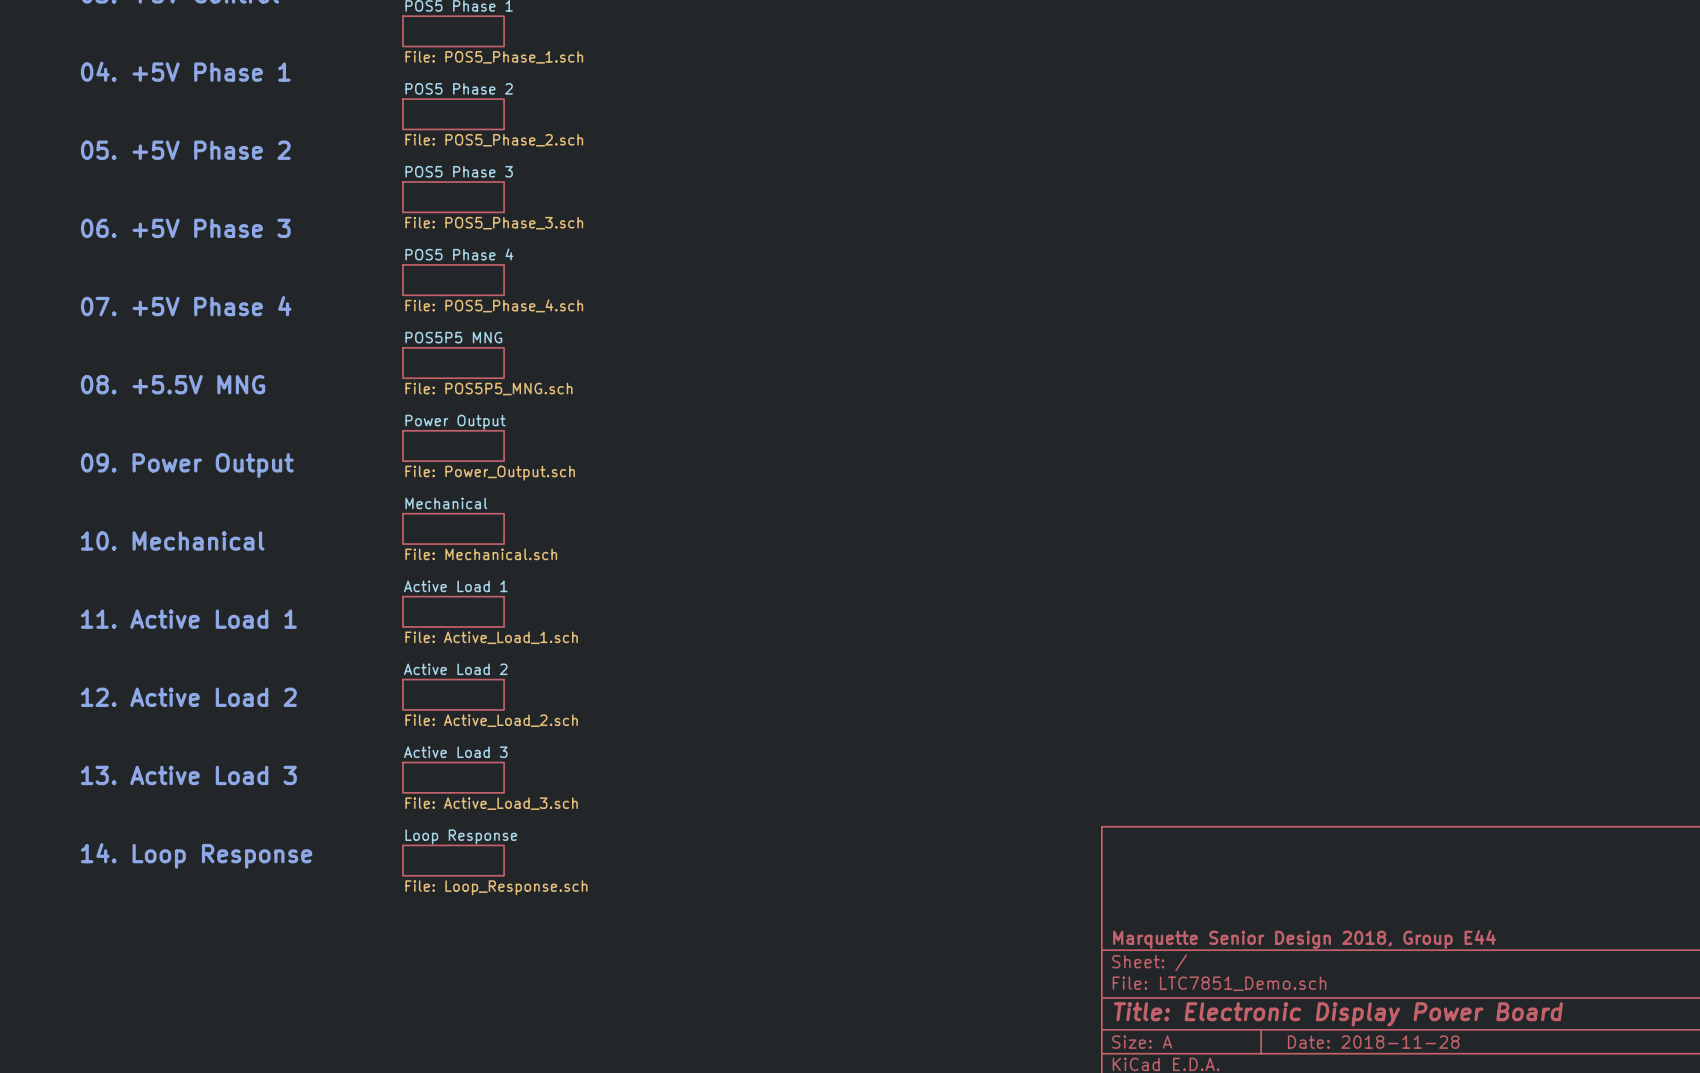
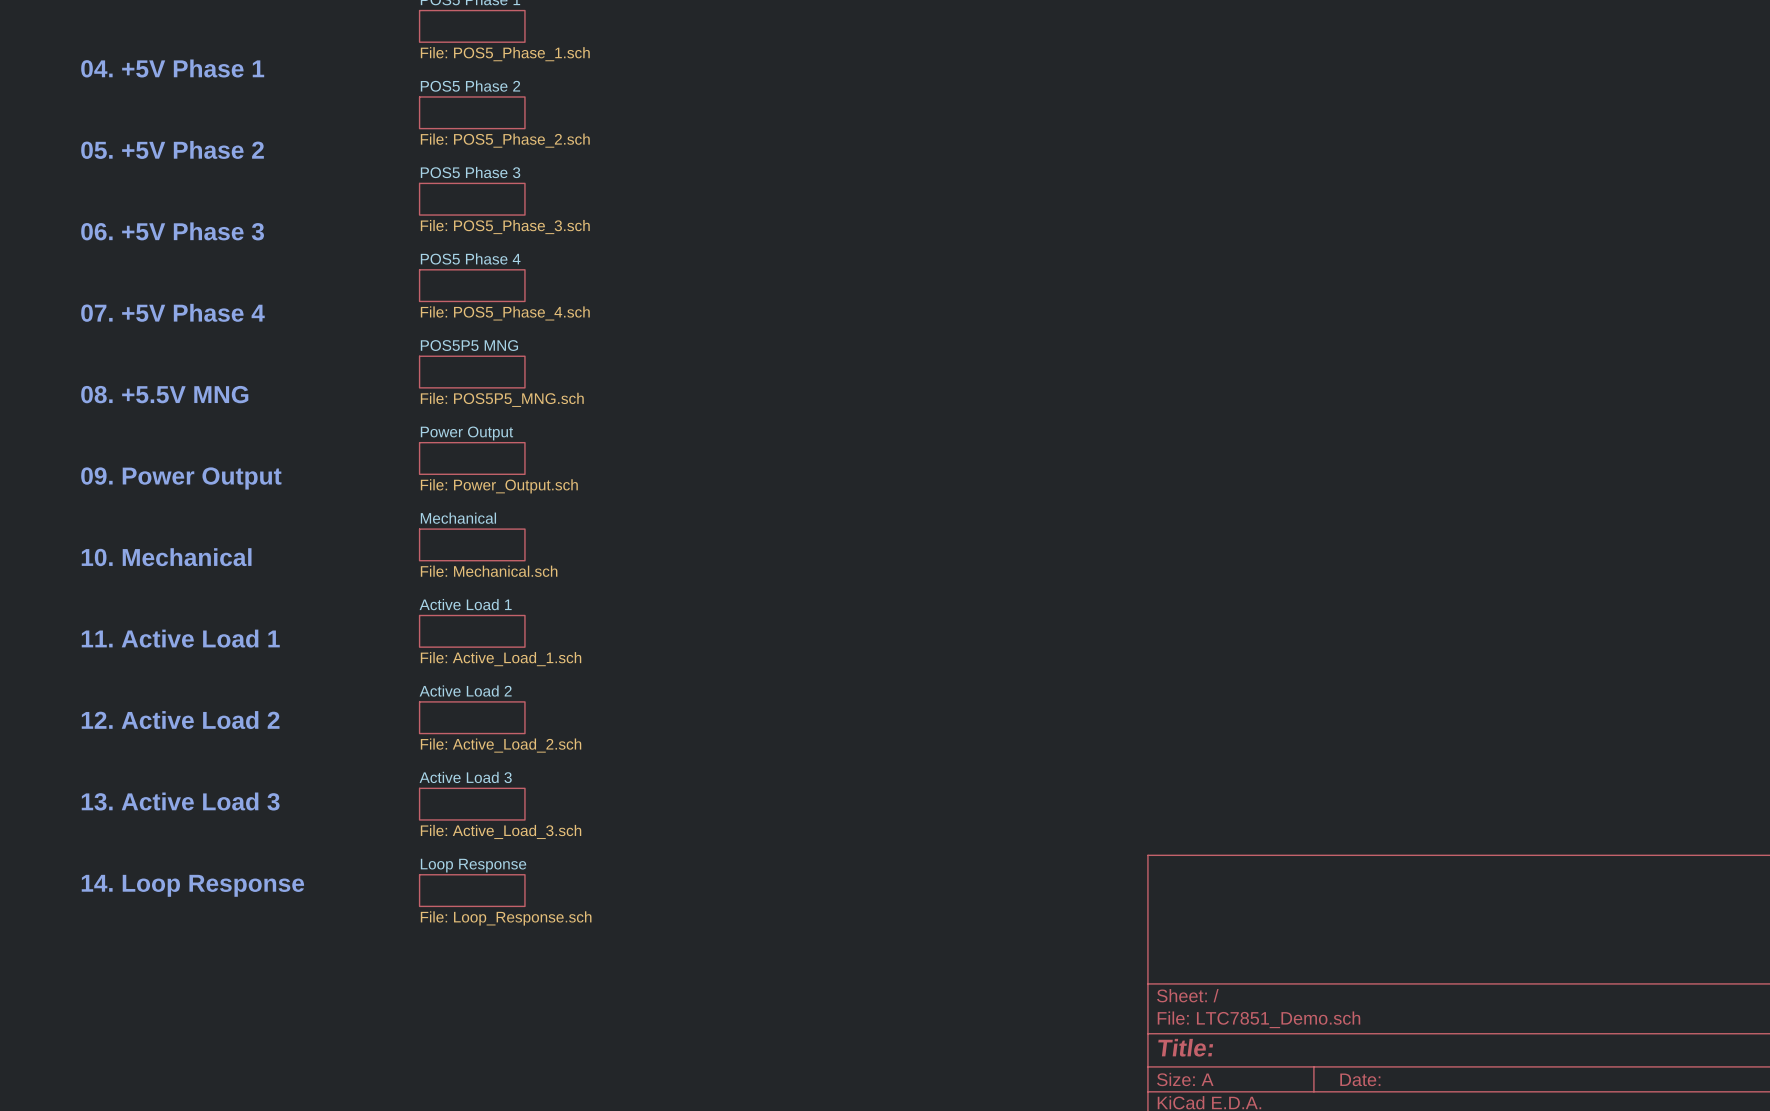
title block: Marquette Senior Design 2018, Group E44 (1304, 939) -> none
title block: Title: Electronic Display Power Board (1338, 1014) -> Title: (1185, 1047)
title block: Date: 2018-11-28 (1373, 1042) -> Date: (1360, 1079)

